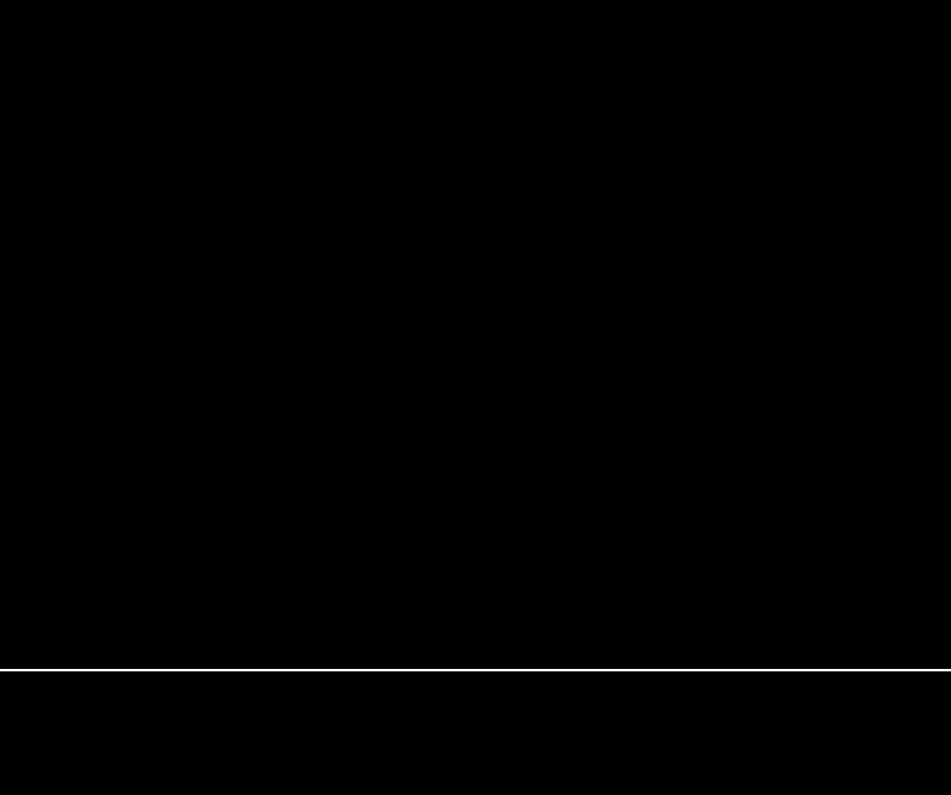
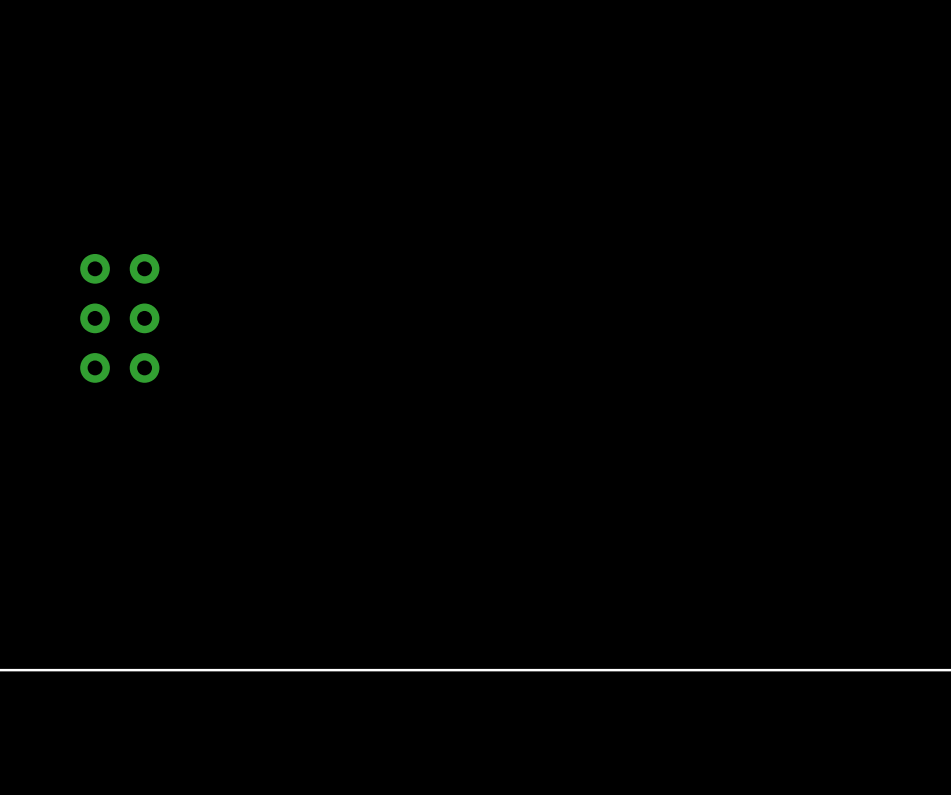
via: none -> (95, 268)
via: none -> (144, 268)
via: none -> (95, 318)
via: none -> (144, 318)
via: none -> (95, 367)
via: none -> (144, 367)

